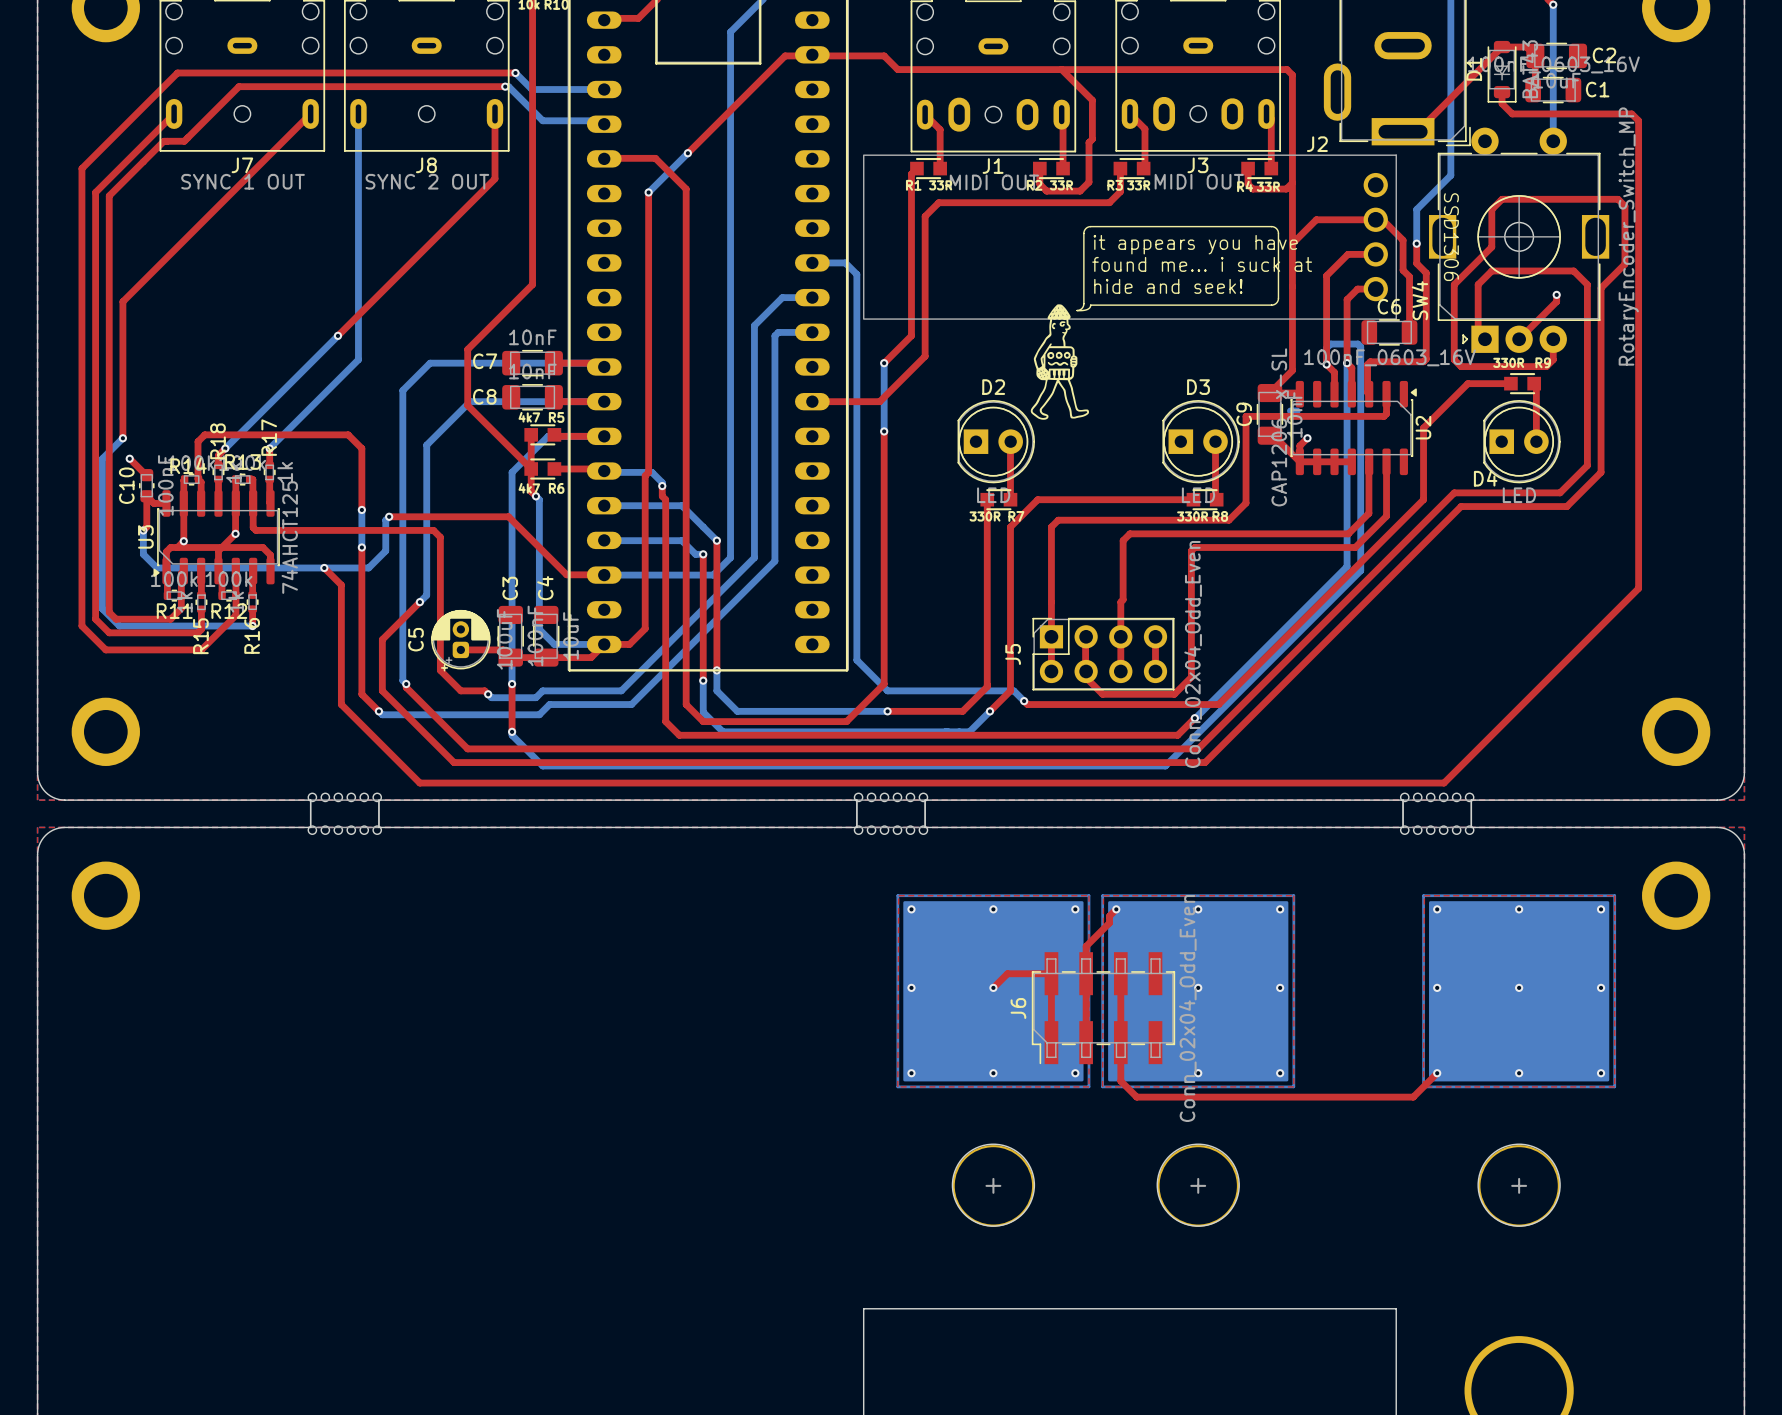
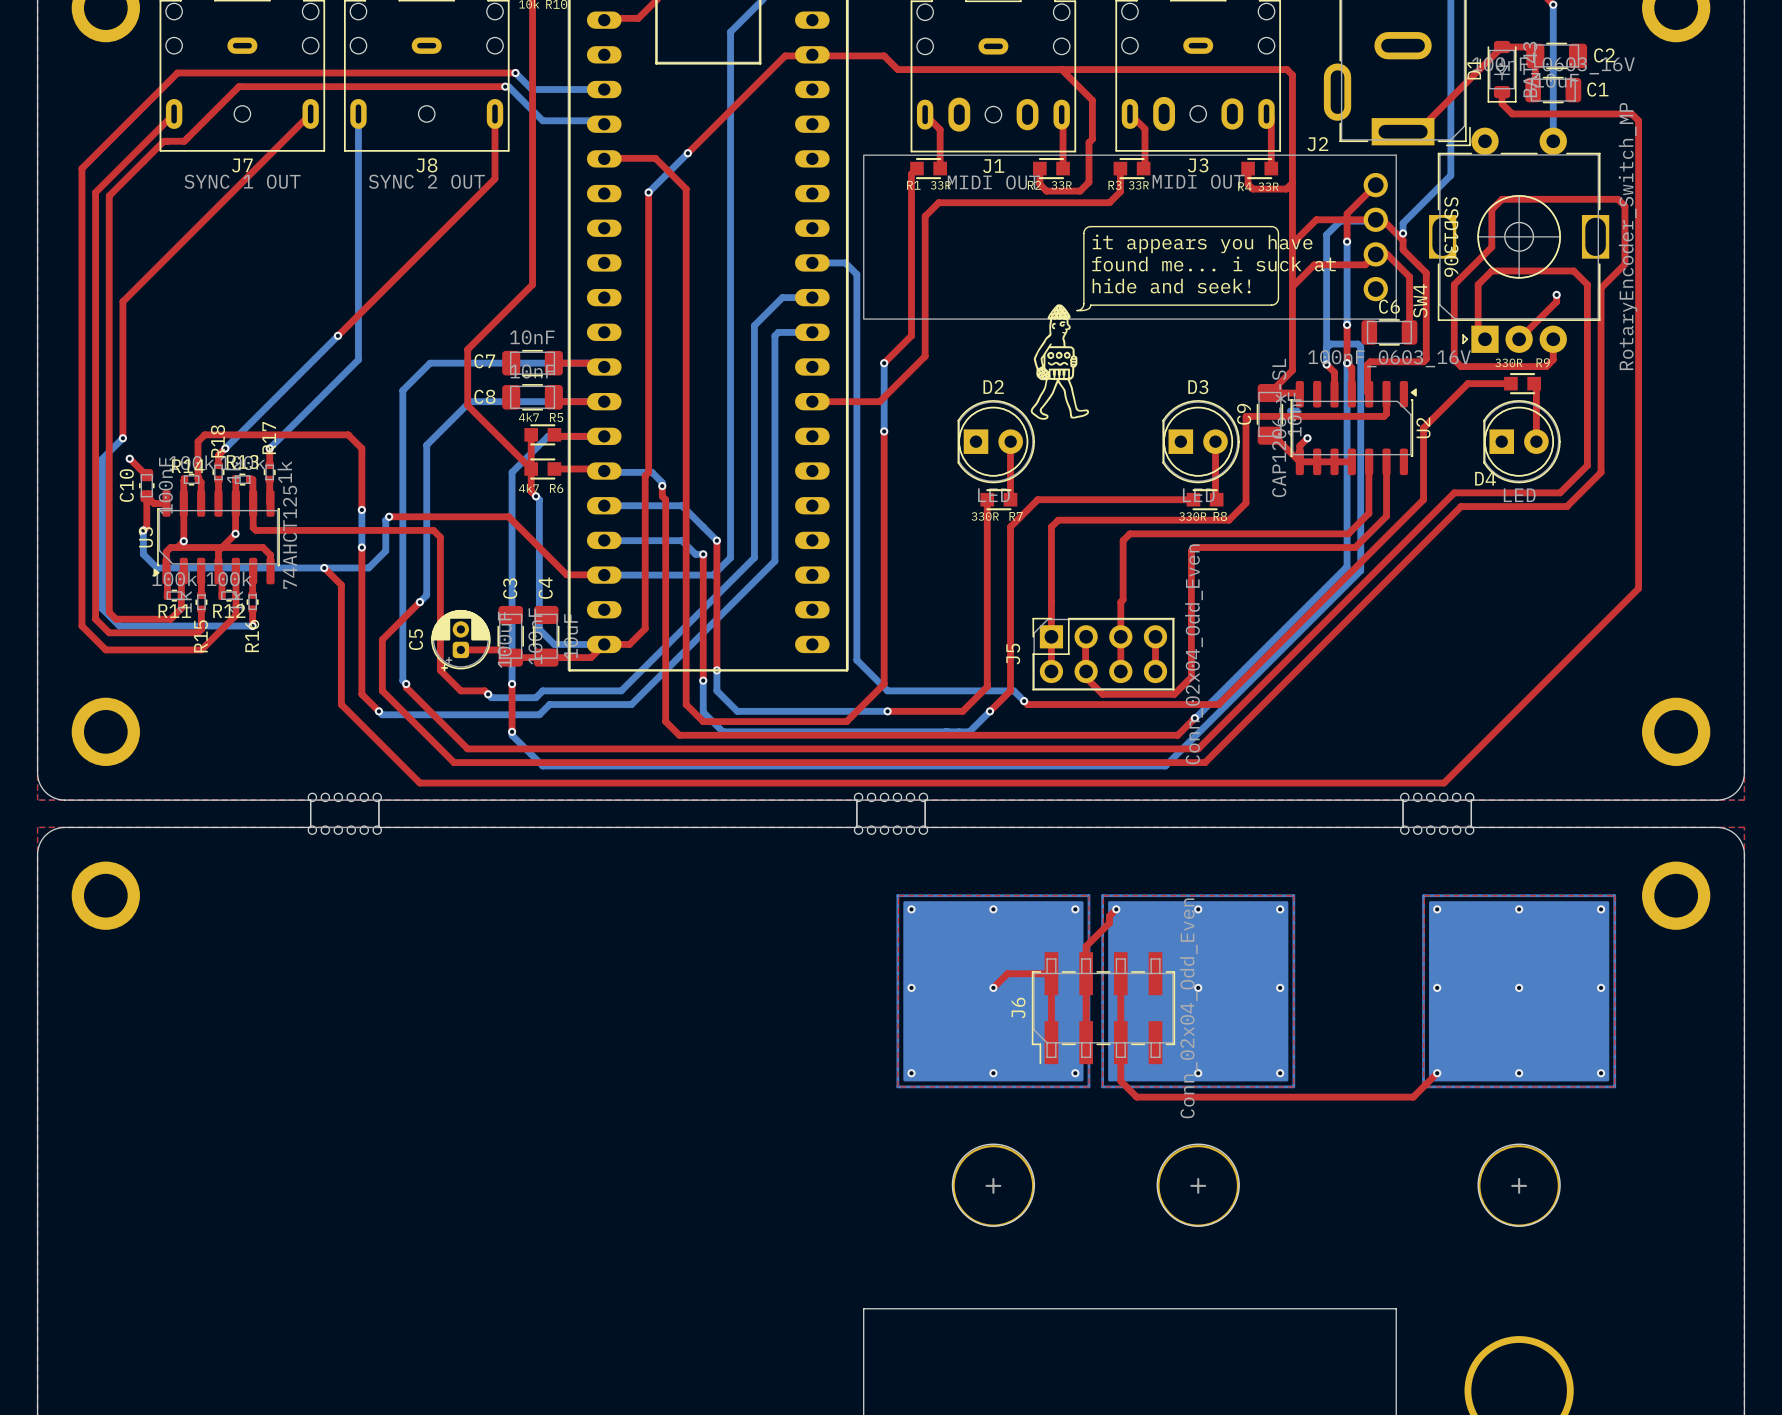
top track: none -> (1375, 185) (1347, 213) (1347, 241)
bottom track: (1416, 209) (1416, 243) -> (1416, 209) (1403, 223) (1403, 233)
bottom track: none -> (1374, 221) (1340, 221) (1326, 234) (1326, 348)
bottom track: none -> (1347, 241) (1347, 324)
via: none -> (1347, 241)
top track: (1416, 243) (1416, 263) -> (1403, 249) (1416, 263)
via position: (1416, 243) -> (1403, 233)
top track: (1403, 249) (1403, 270) -> (1376, 253) (1386, 253) (1403, 270)
top track: (1375, 254) (1347, 254) (1326, 275) (1326, 364) -> (1375, 254) (1365, 264) (1314, 264) (1292, 286)
top track: (1375, 289) (1357, 289) (1347, 299) (1347, 324) -> none
via: none -> (1347, 324)

